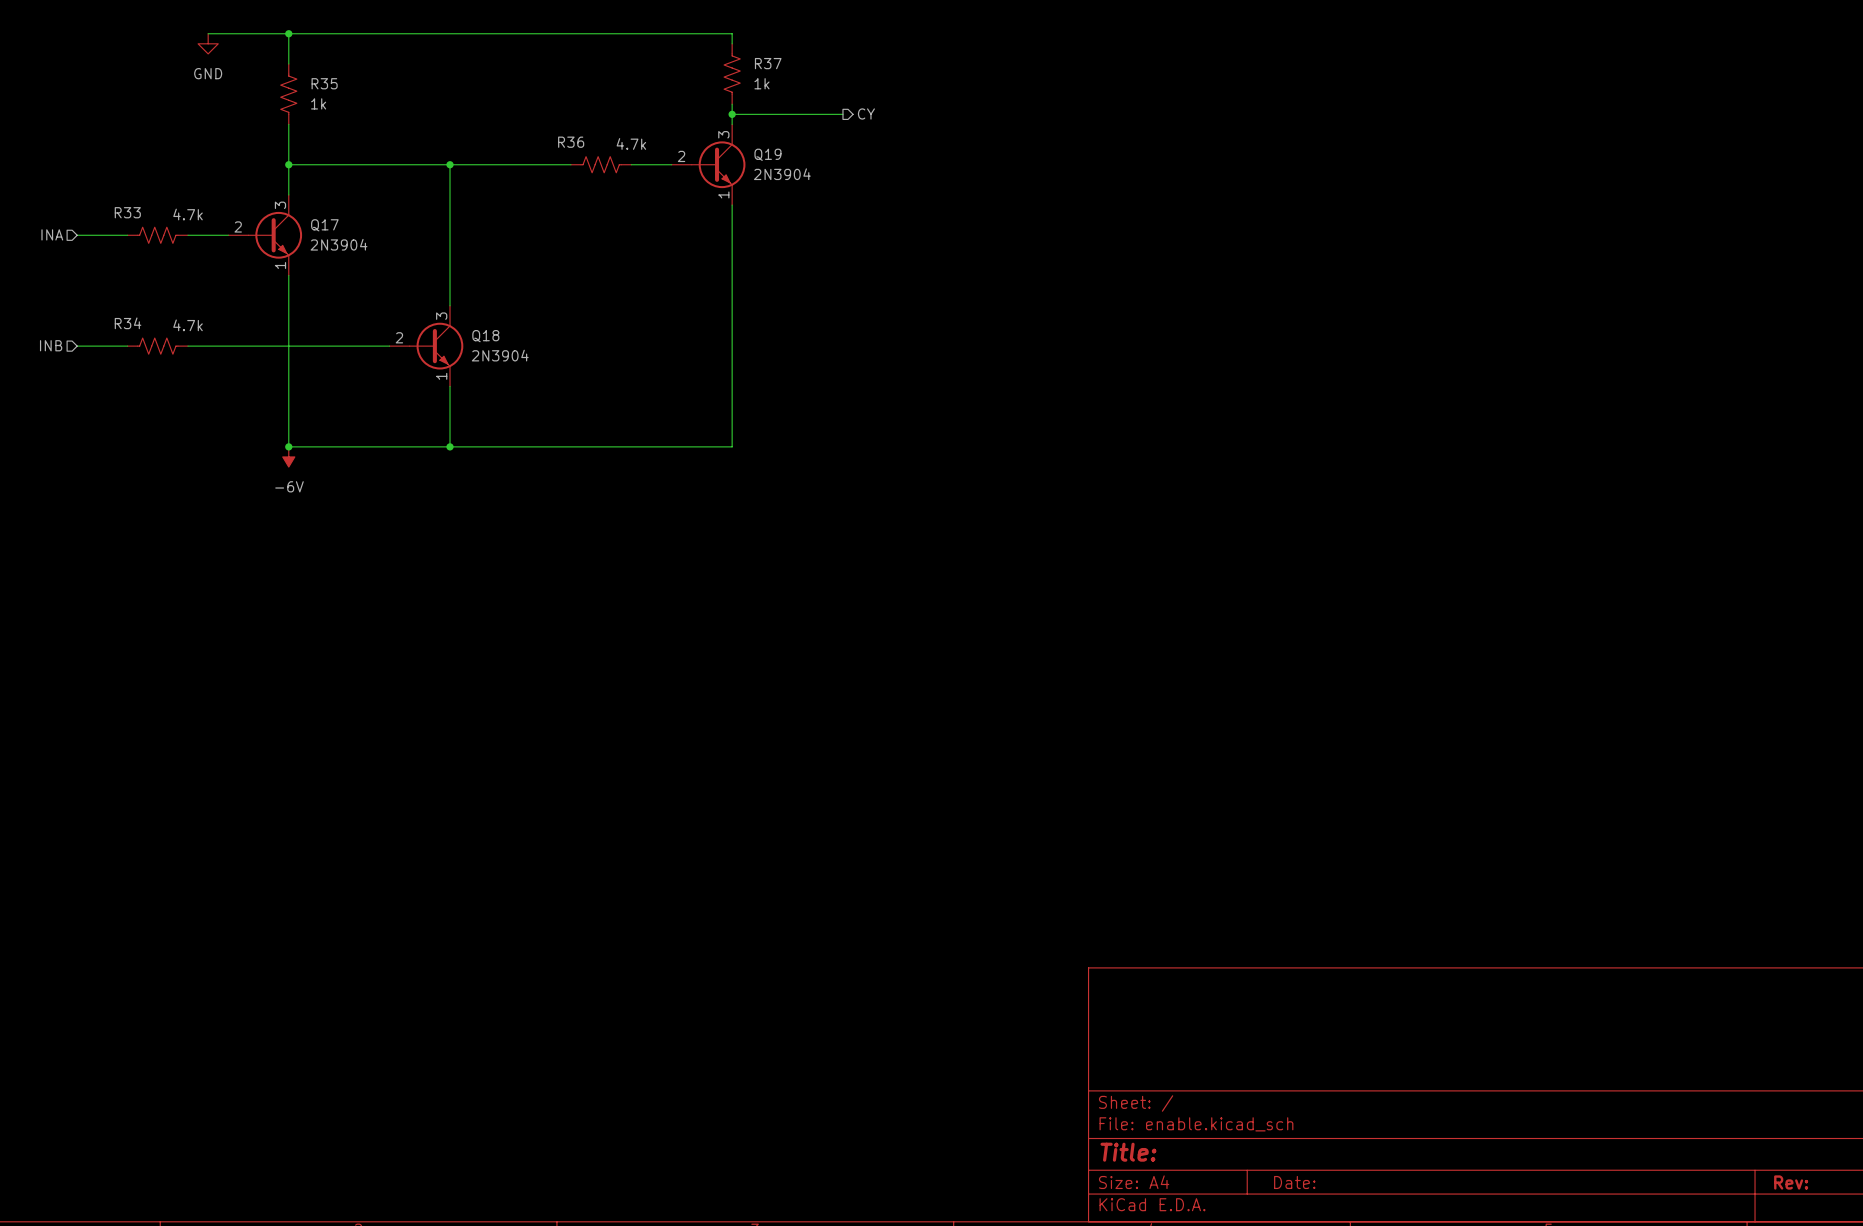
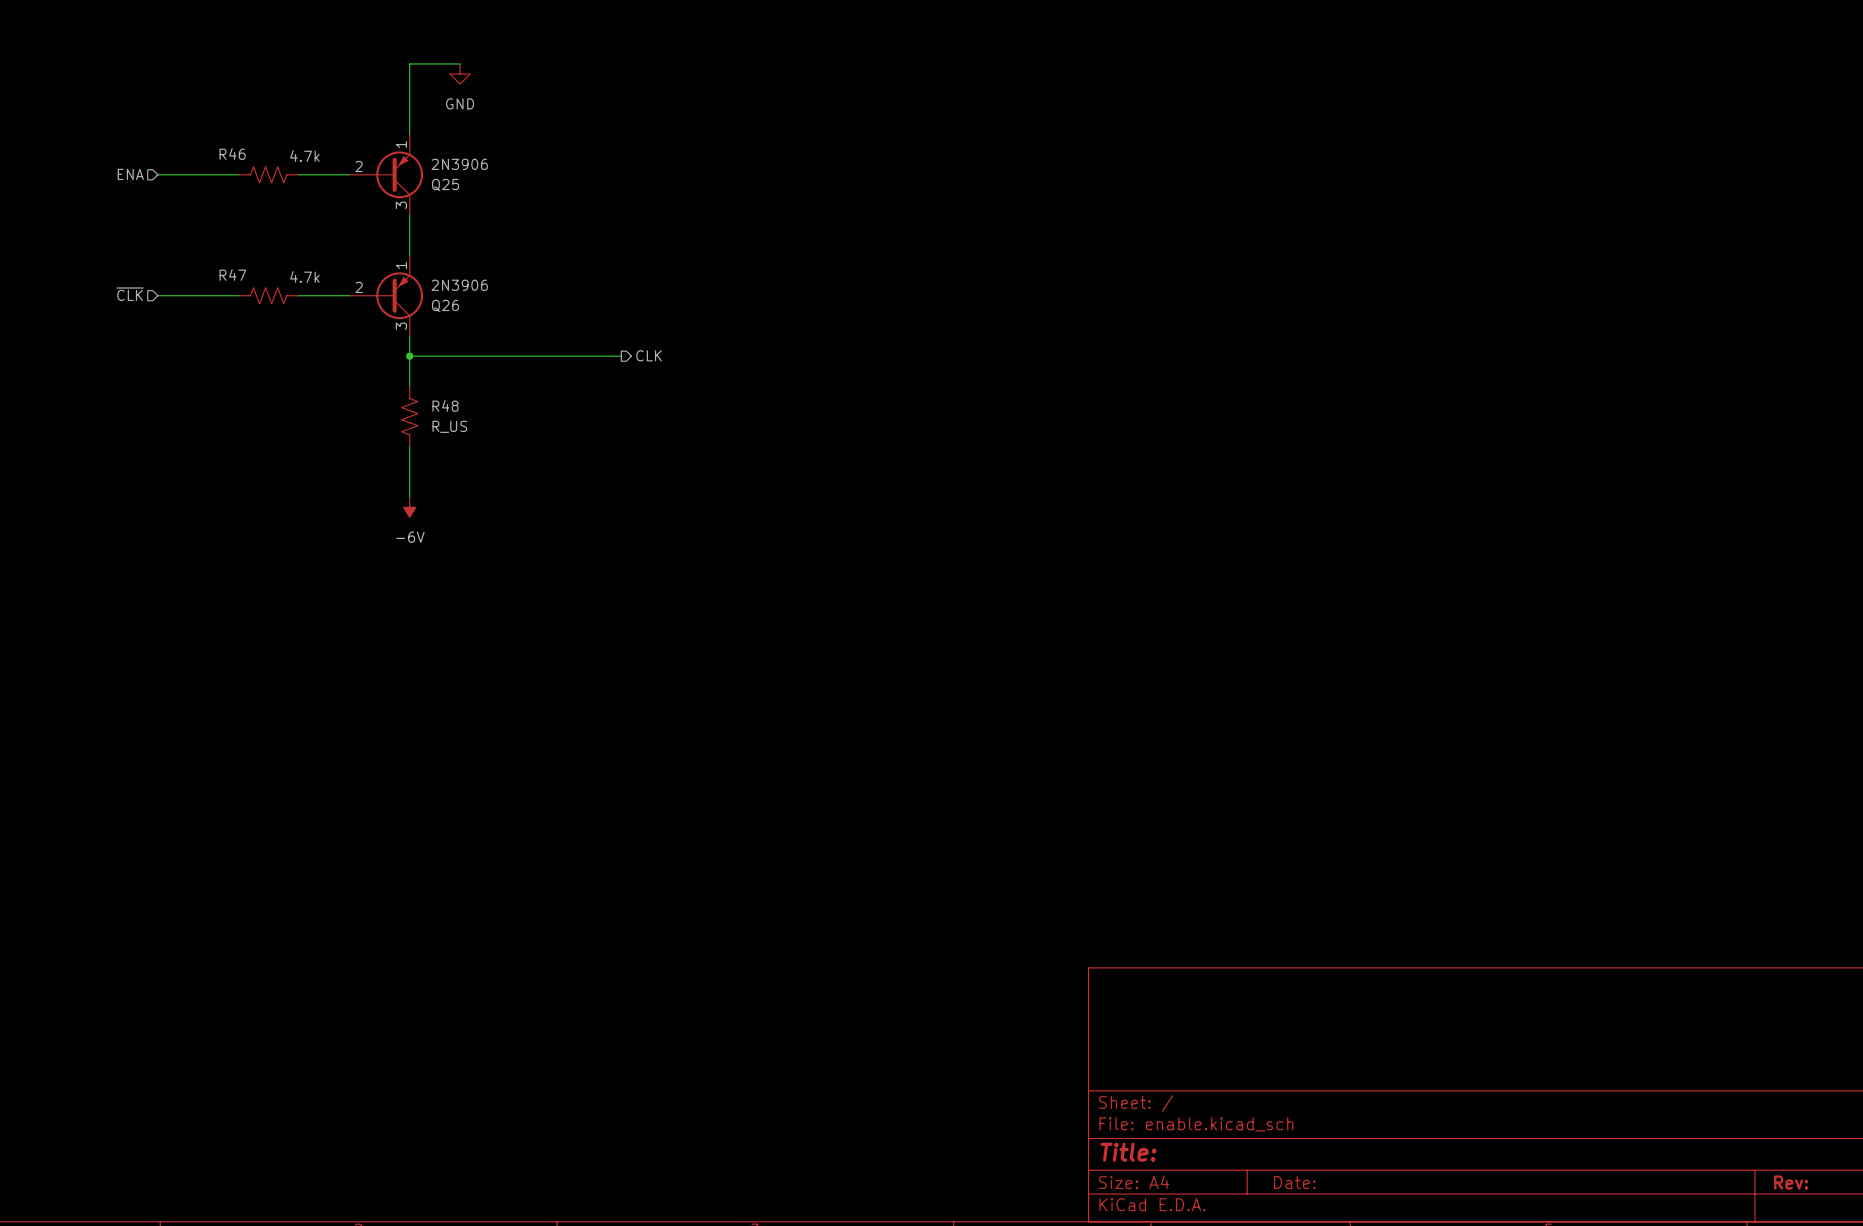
wire: (208, 33) (732, 33) (732, 43) -> none
wire: (288, 33) (288, 63) -> none
junction: (288, 33) -> none
power symbol: GND (208, 43) -> none
wire: none -> (460, 63) (409, 63) (409, 134)
power symbol: none -> GND (460, 74)
R37: 1k (732, 74) -> none
R35: 1k (288, 94) -> none
wire: (732, 104) (732, 124) -> none
hierarchical label: CY (866, 113) -> none
wire: (732, 114) (842, 114) -> none
junction: (732, 114) -> none
wire: (288, 124) (288, 194) -> none
wire: (288, 164) (570, 164) -> none
junction: (288, 164) -> none
wire: (450, 164) (450, 305) -> none
junction: (450, 164) -> none
R36: 4.7k (601, 164) -> none
wire: (631, 164) (671, 164) -> none
Q19: 2N3904 (708, 164) -> none
hierarchical label: none -> ENA (130, 174)
wire: none -> (157, 174) (238, 174)
R46: none -> 4.7k (268, 174)
wire: none -> (298, 174) (349, 174)
Q25: none -> 2N3906 (386, 174)
wire: (732, 205) (732, 446) (288, 446) (288, 275) -> none
wire: none -> (409, 215) (409, 255)
hierarchical label: INA (52, 234) -> none
wire: (77, 235) (127, 235) -> none
R33: 4.7k (157, 235) -> none
wire: (188, 235) (228, 235) -> none
Q17: 2N3904 (265, 235) -> none
hierarchical label: none -> ~{CLK} (130, 294)
wire: none -> (157, 295) (238, 295)
R47: none -> 4.7k (268, 295)
wire: none -> (298, 295) (349, 295)
Q26: none -> 2N3906 (386, 295)
wire: none -> (409, 336) (409, 386)
hierarchical label: INB (51, 345) -> none
wire: (77, 346) (127, 346) -> none
R34: 4.7k (157, 346) -> none
wire: (188, 346) (389, 346) -> none
Q18: 2N3904 (426, 346) -> none
hierarchical label: none -> CLK (649, 355)
wire: none -> (409, 356) (621, 356)
junction: none -> (409, 356)
wire: (450, 386) (450, 446) -> none
R48: none -> R_US (409, 416)
junction: (288, 446) -> none
wire: none -> (409, 446) (409, 497)
junction: (450, 446) -> none
power symbol position: -6V (288, 456) -> -6V (409, 507)

